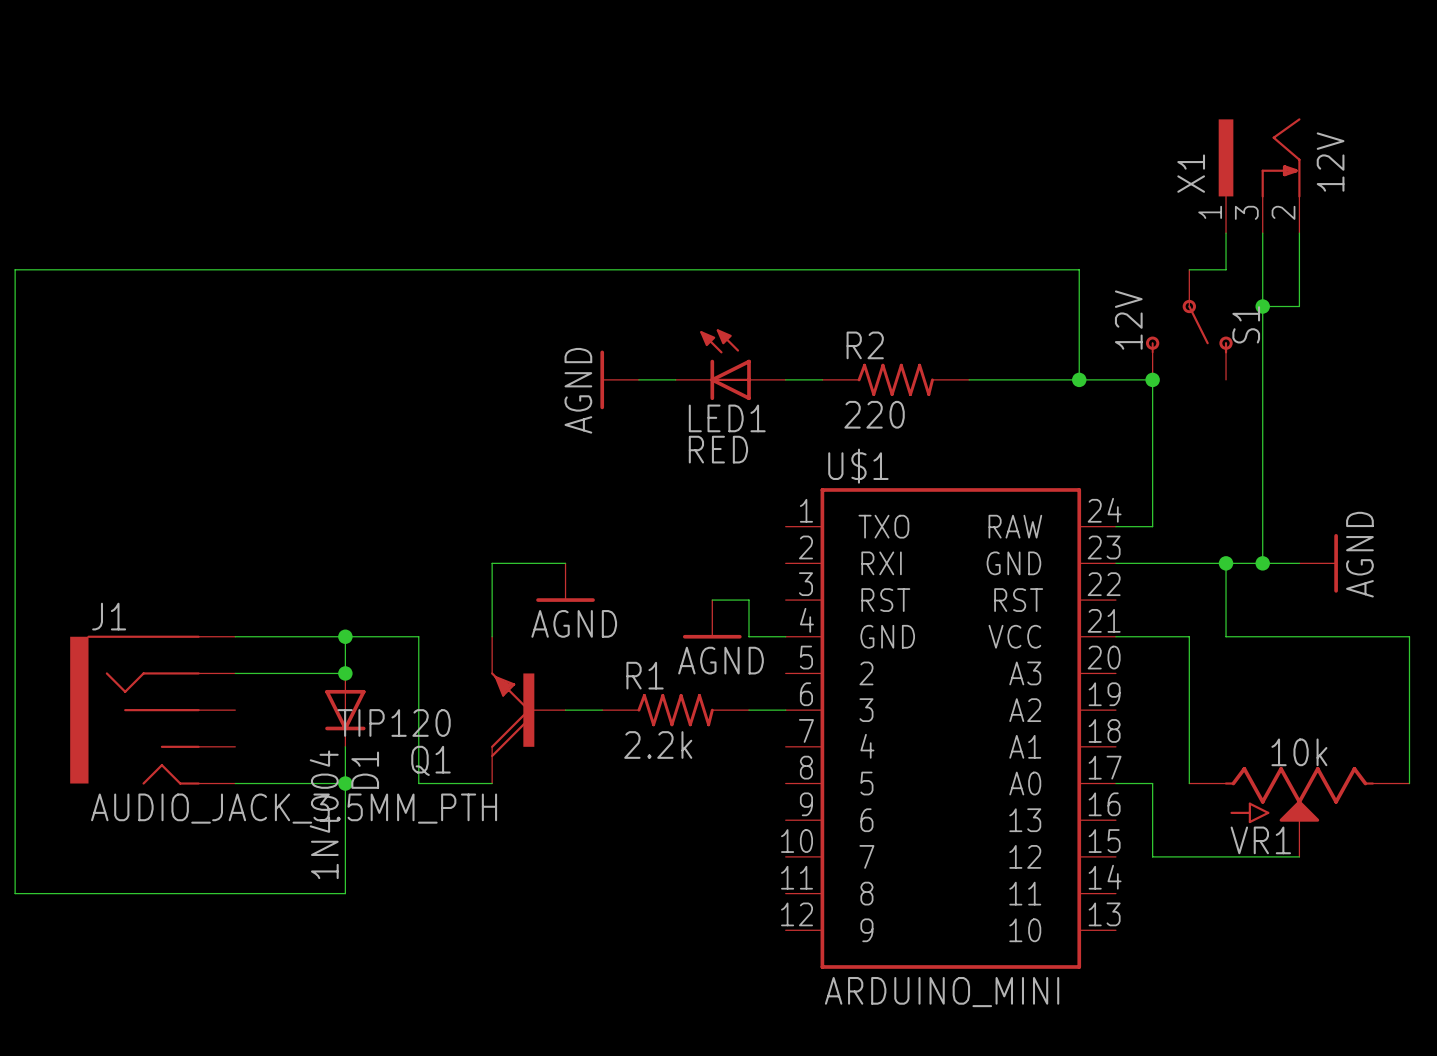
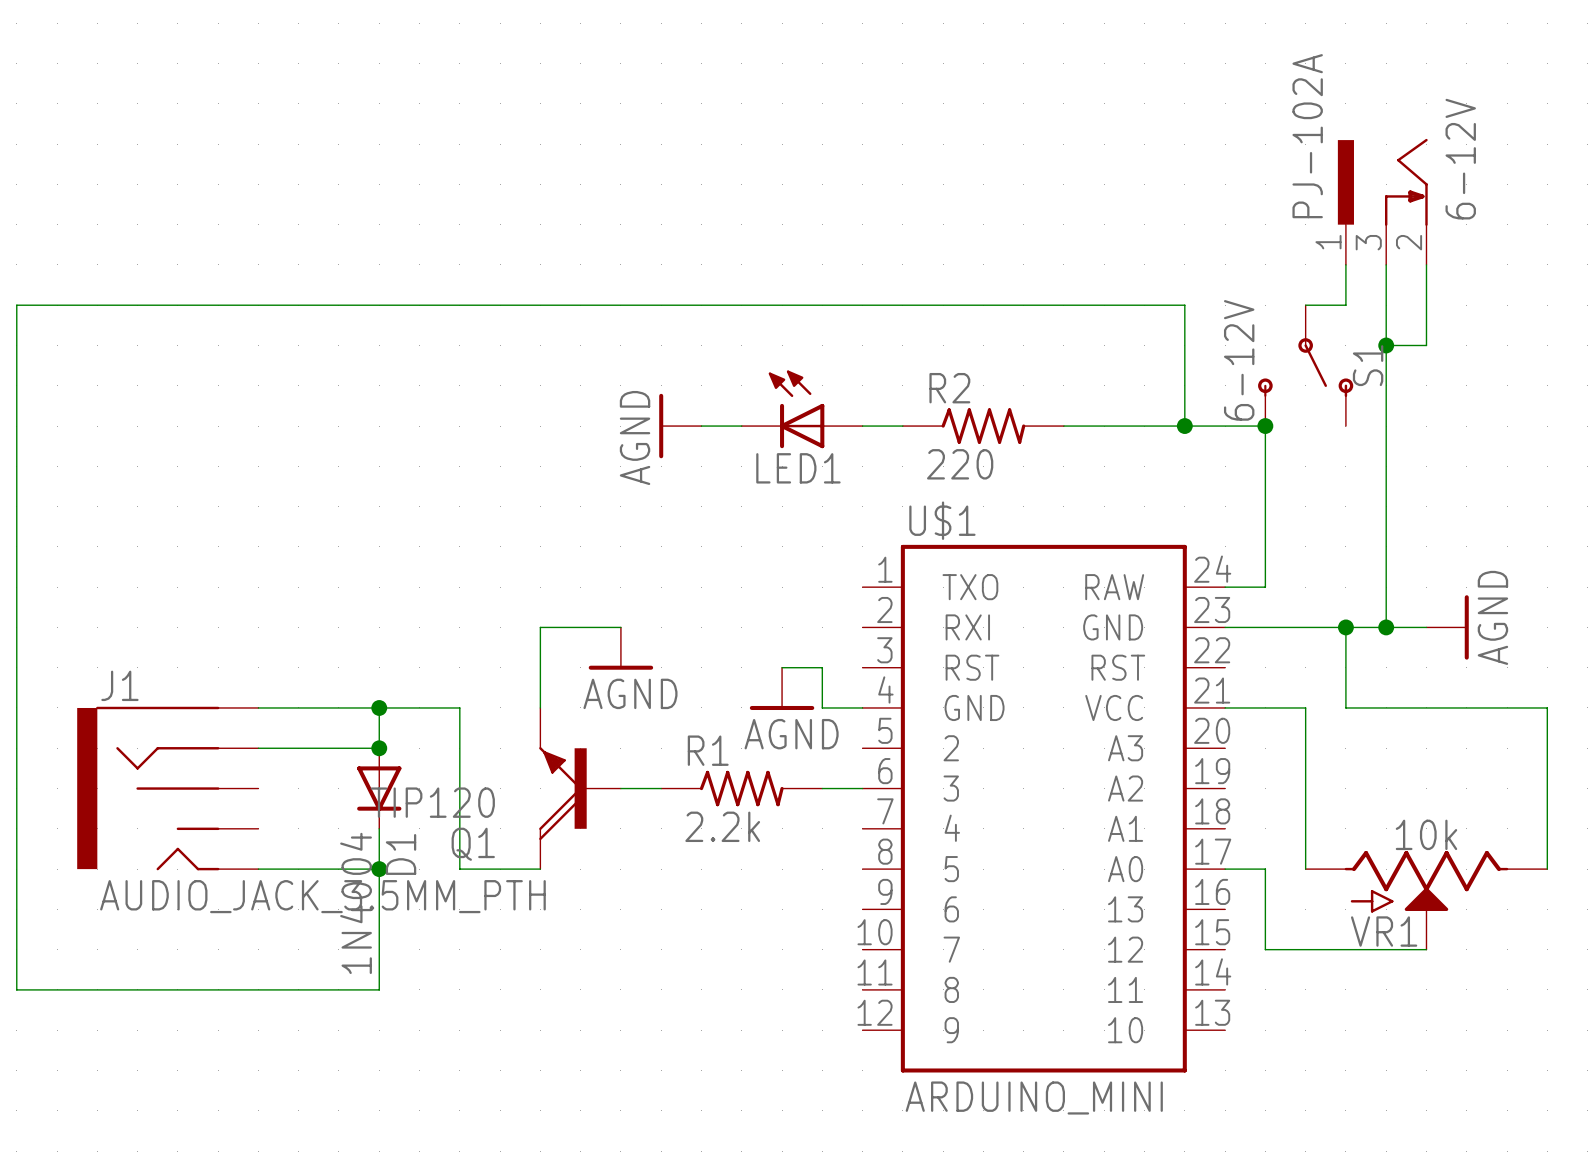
X1 value: 12V (1330, 162) -> 6-12V (1460, 159)
X1 name: X1 (1191, 173) -> PJ-102A (1307, 136)
S1 value: 12V (1128, 320) -> 6-12V (1239, 360)
LED1 value: RED (718, 449) -> none

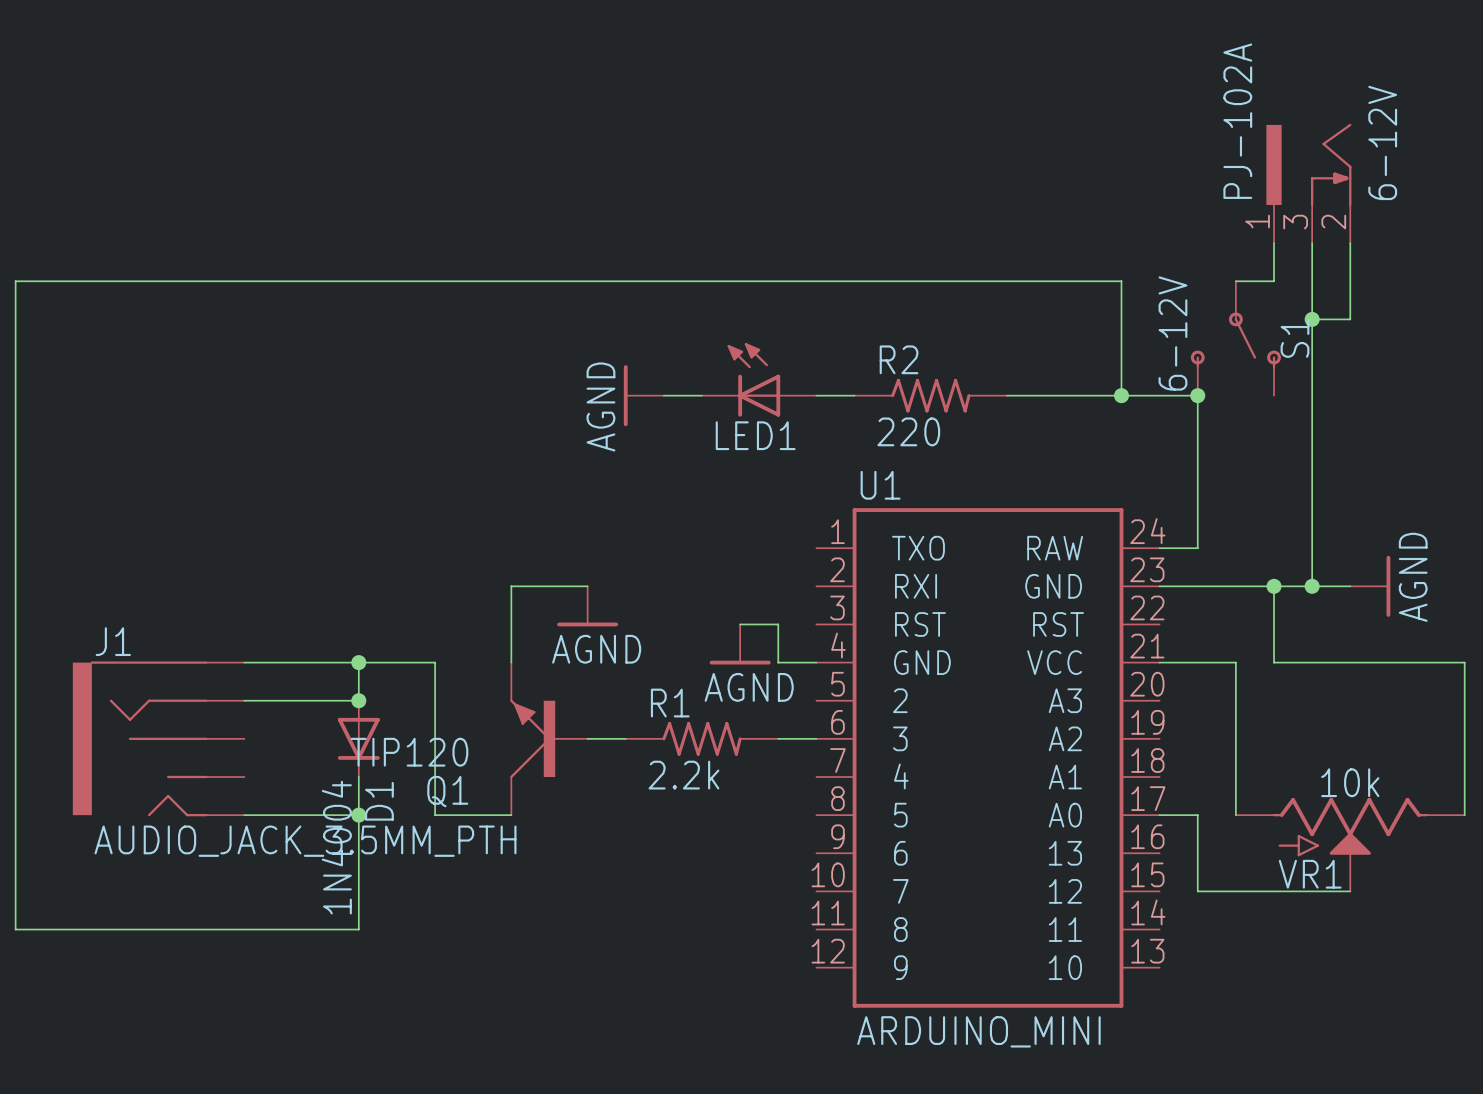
U$1 name: U$1 (942, 520) -> U1 (880, 485)
Q1 symbol: [539, 707, 621, 870] -> [510, 662, 588, 816]

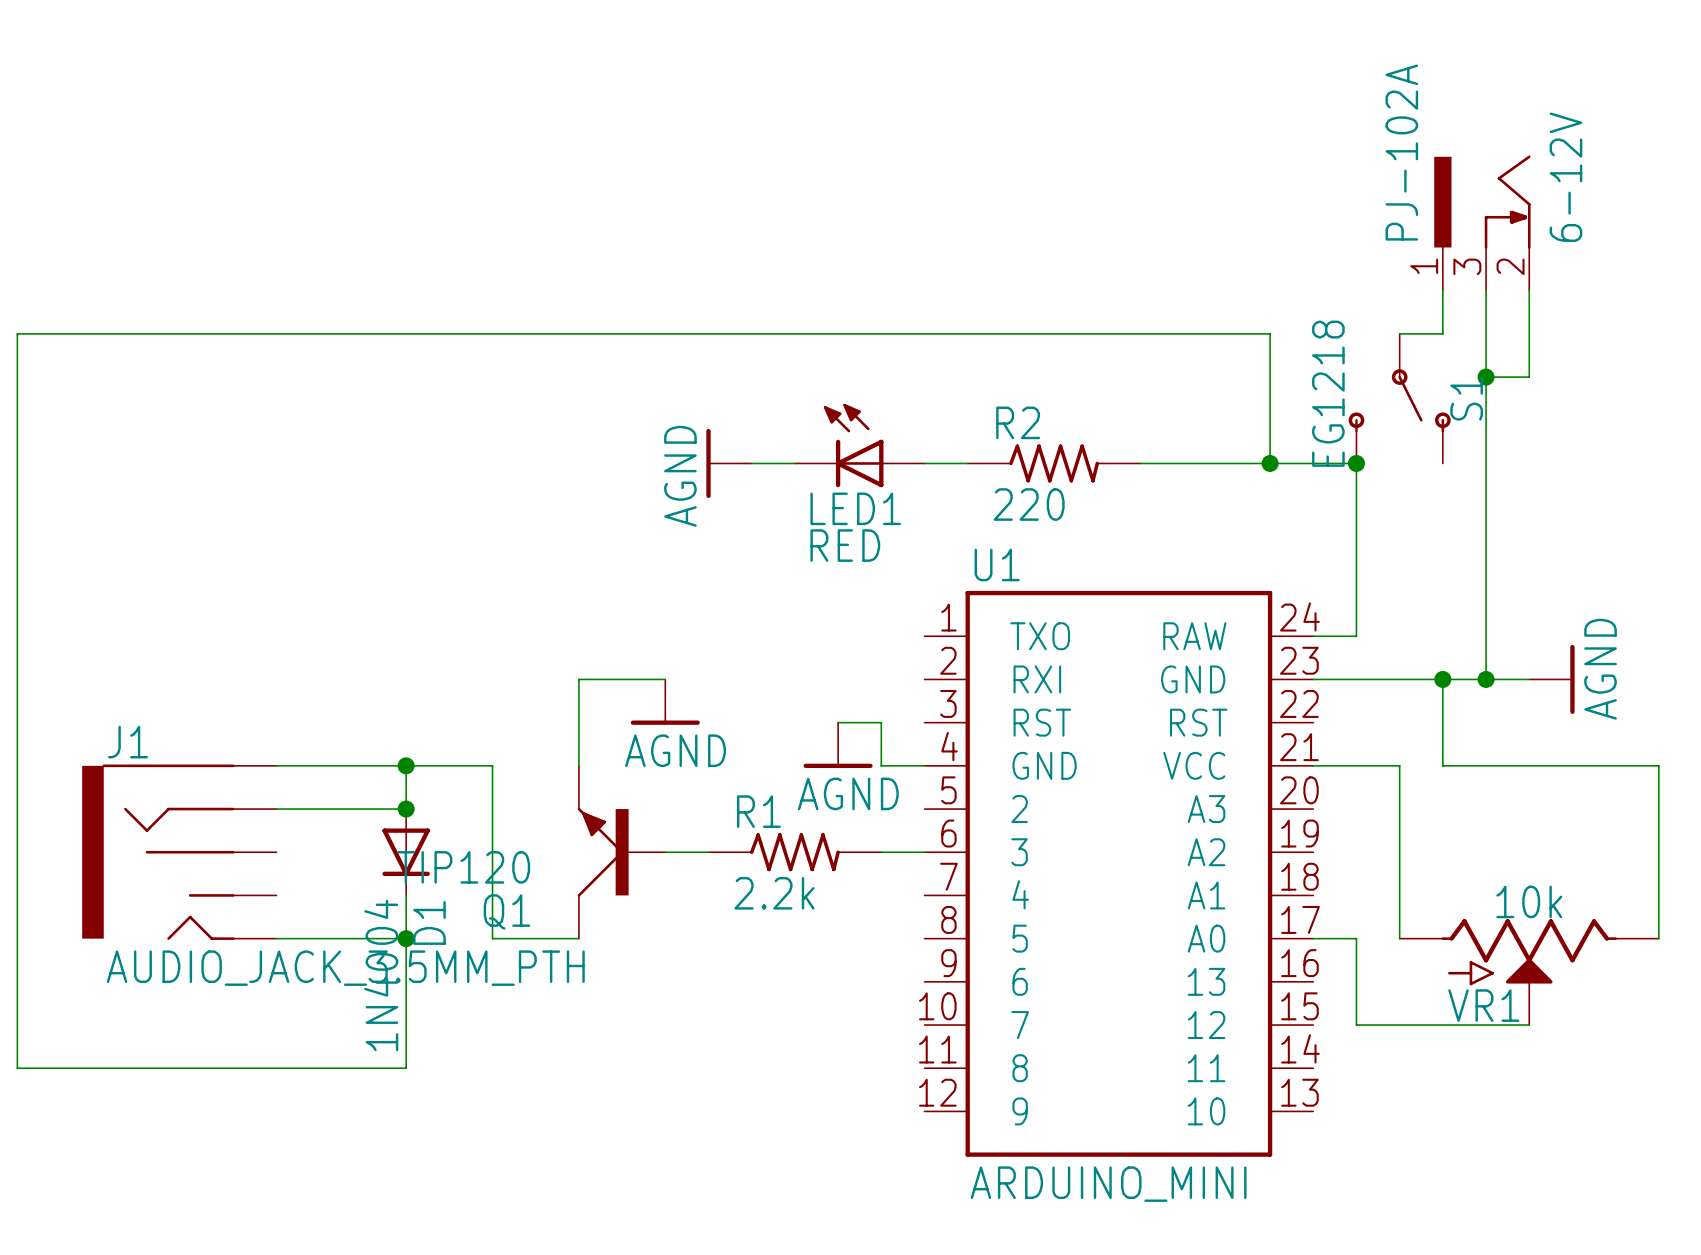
S1 value: 6-12V (1172, 333) -> EG1218 (1328, 393)
LED1 value: none -> RED (845, 545)

